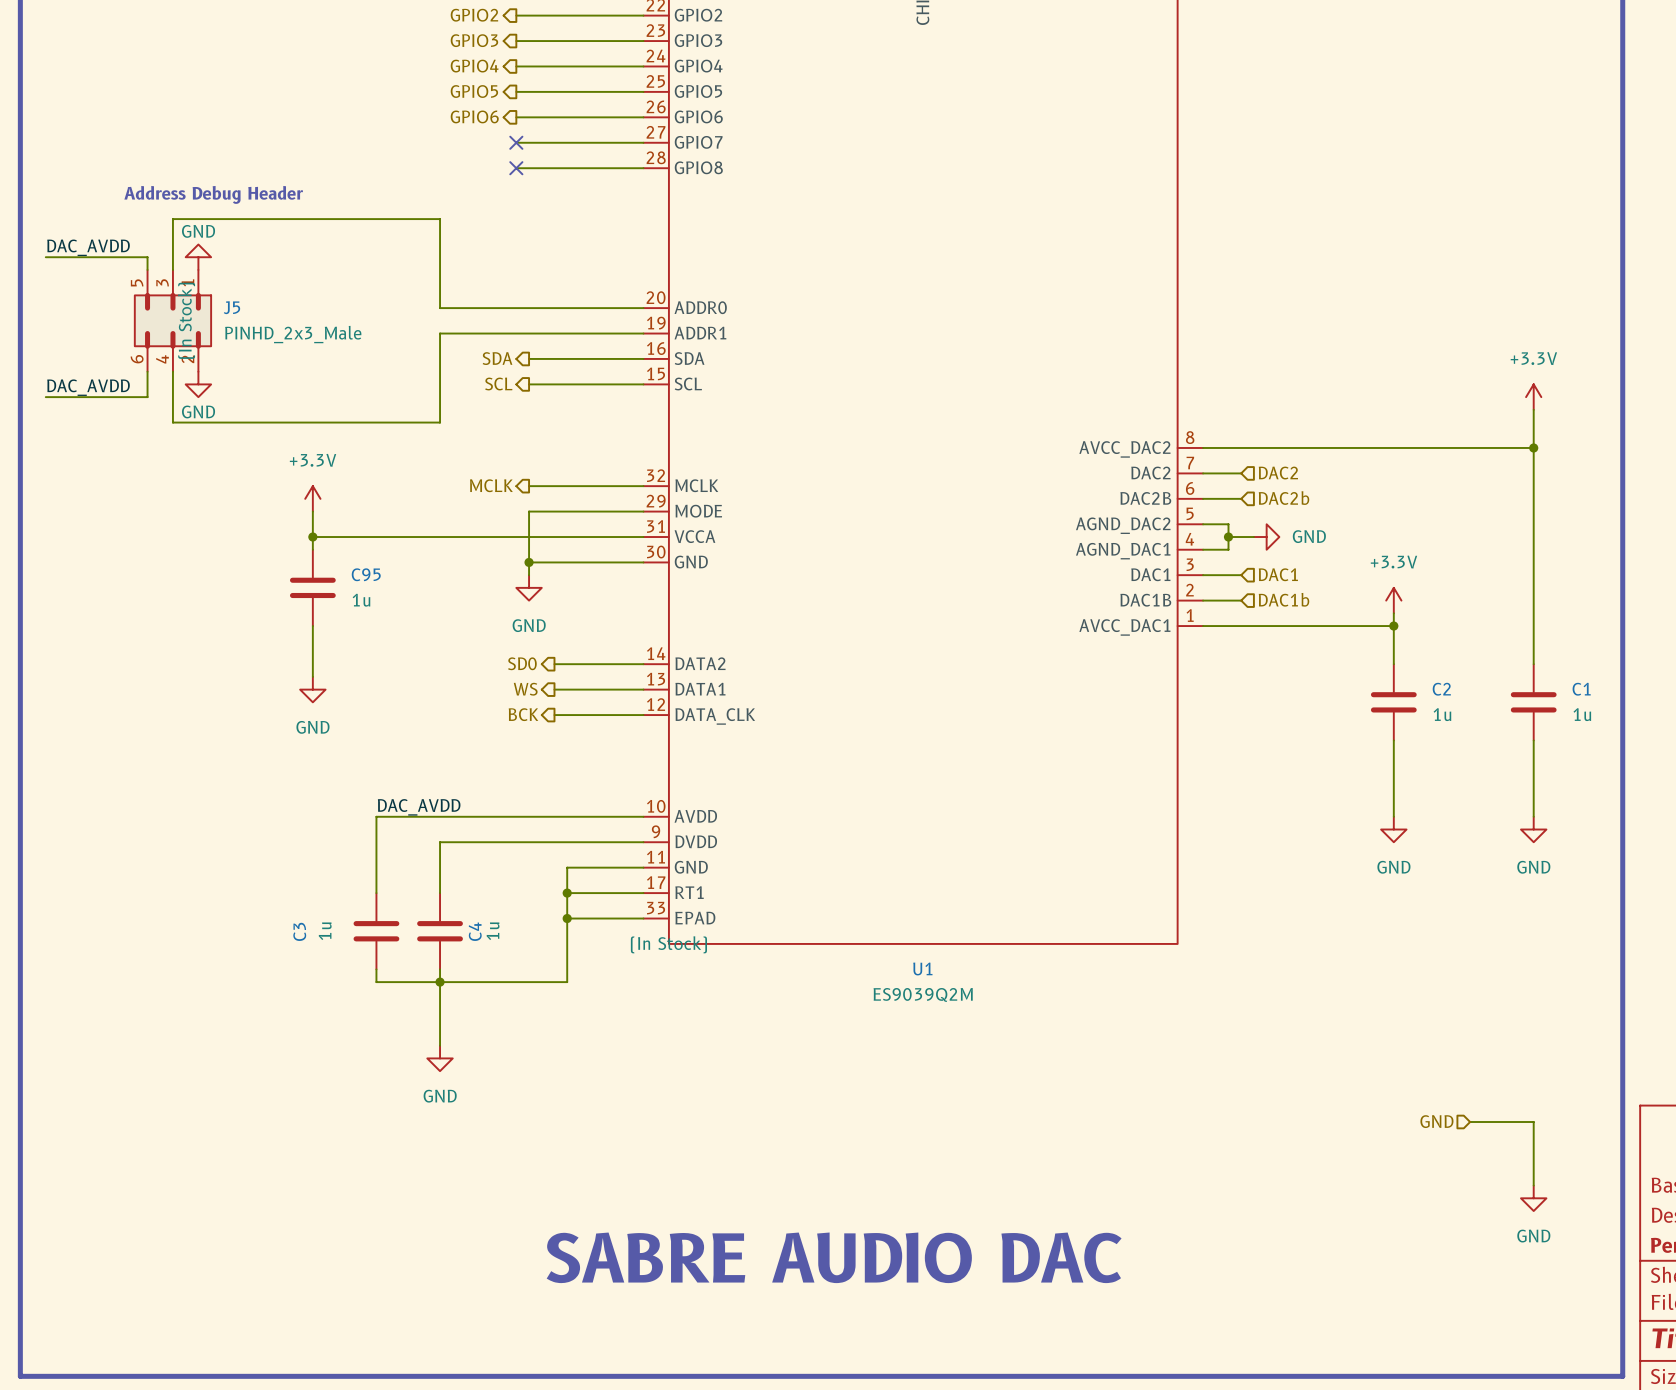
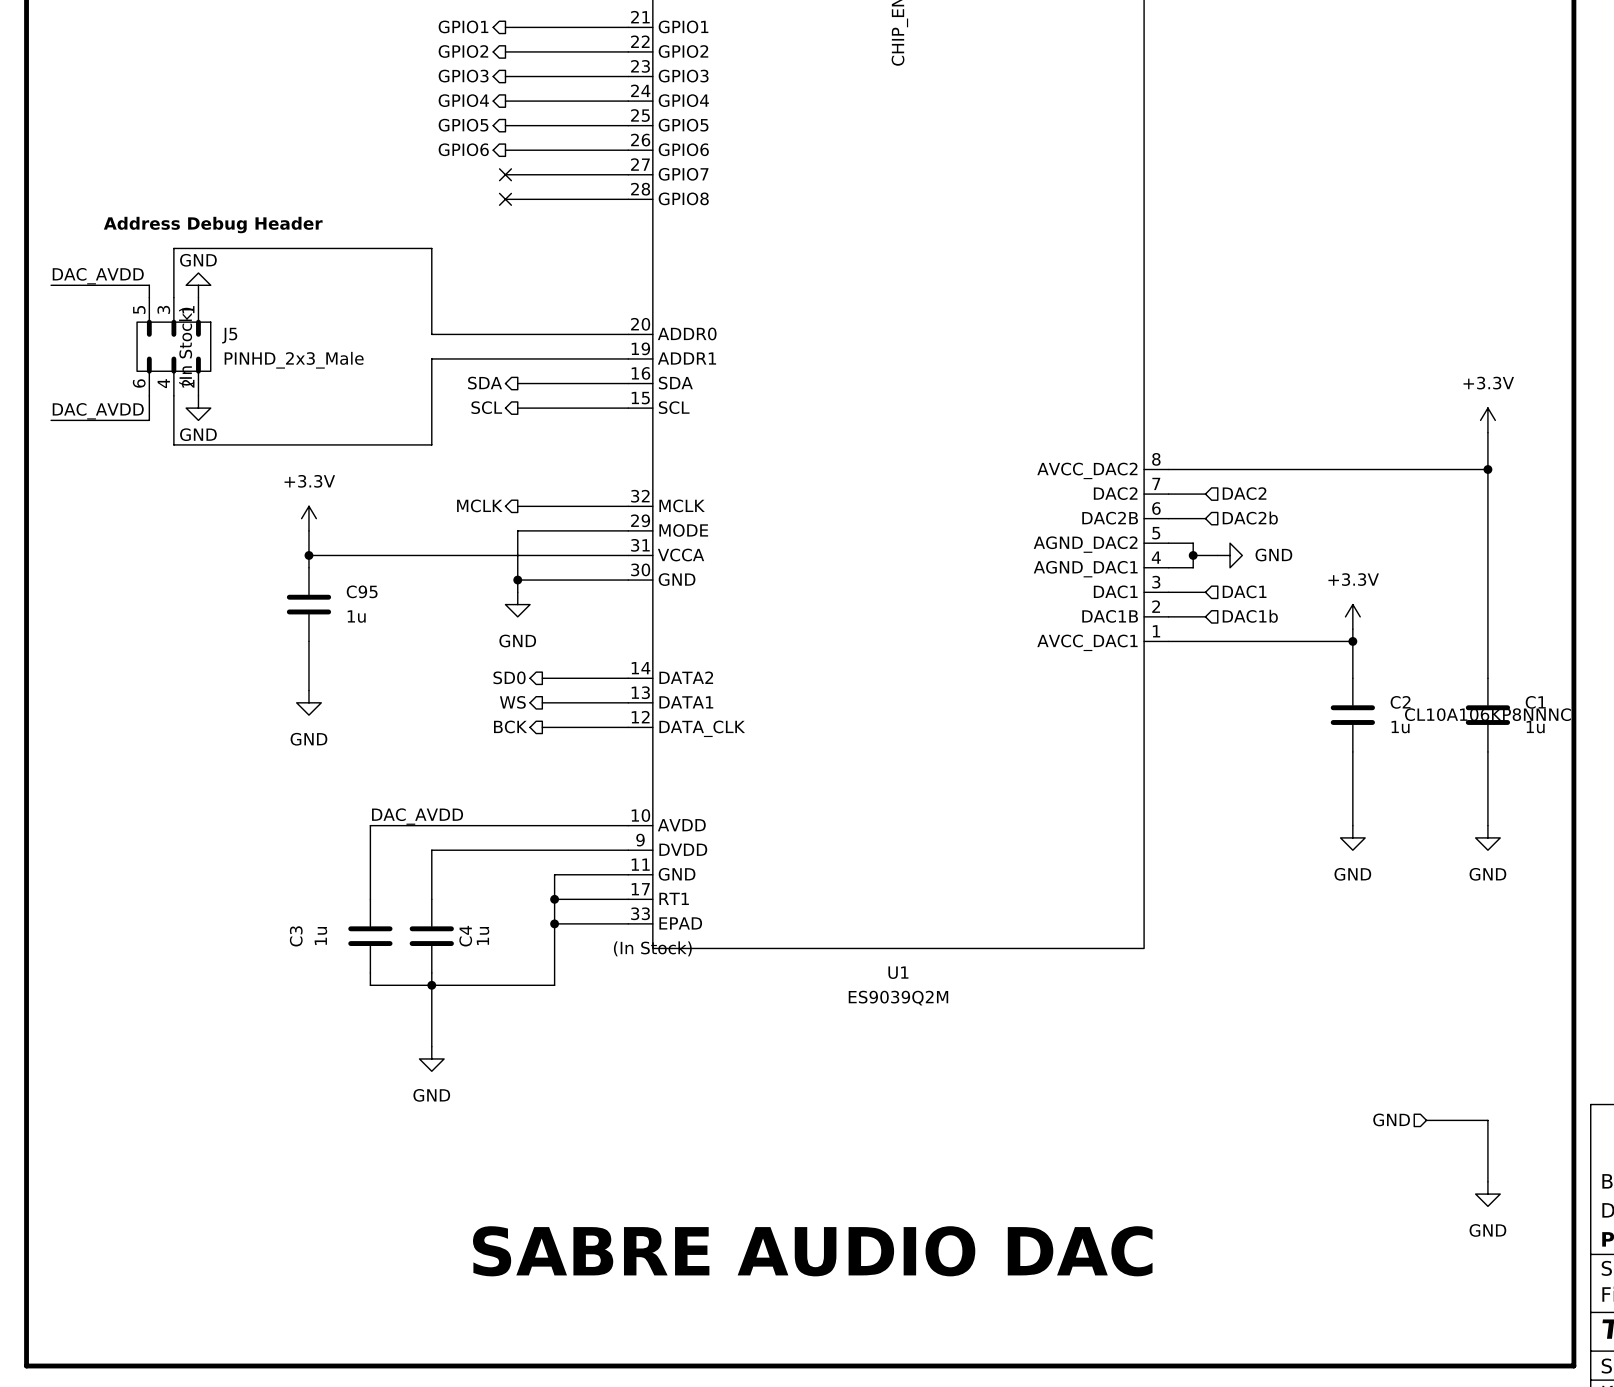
C1 text: none -> CL10A106KP8NNNC (1487, 714)

